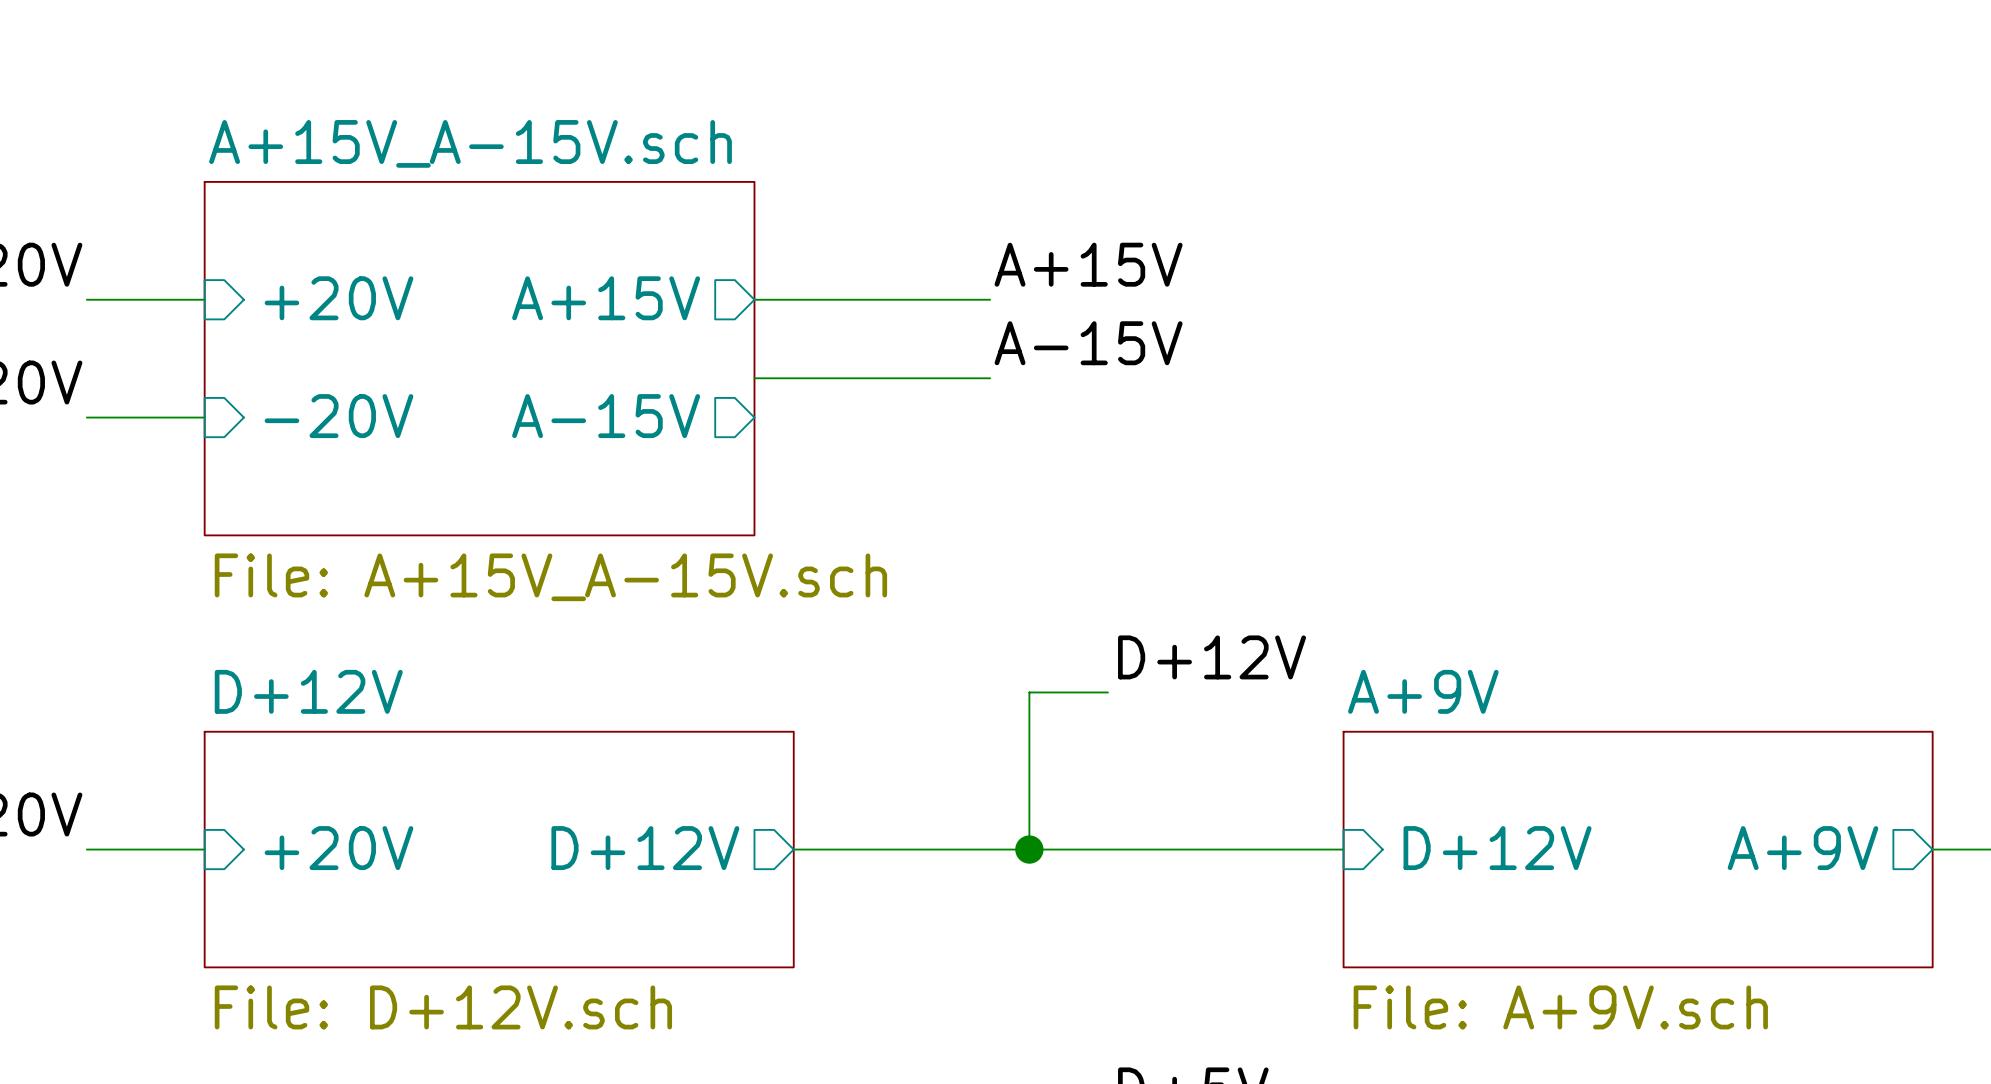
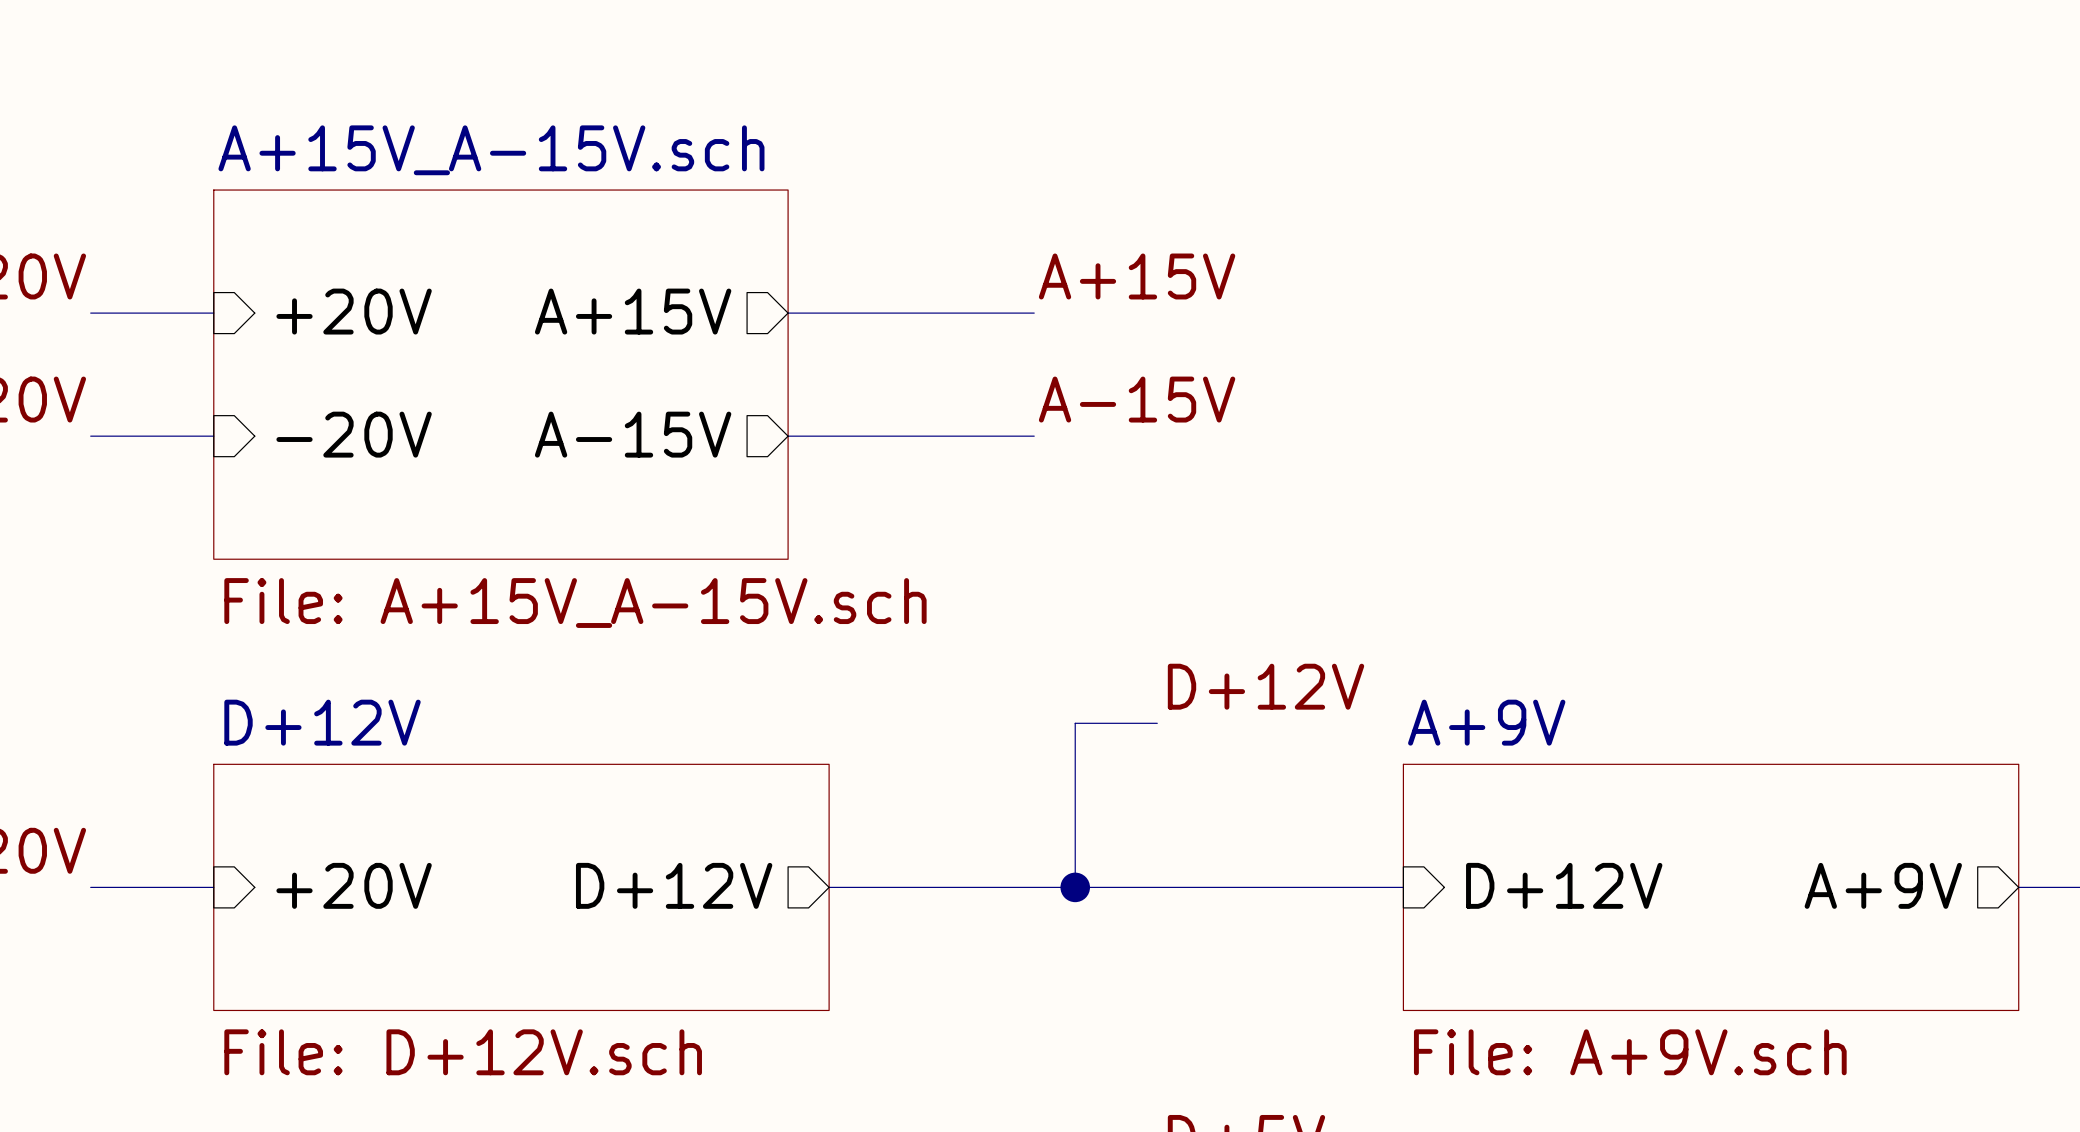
label position: A-15V (1088, 343) -> A-15V (1137, 399)
wire: (754, 378) (990, 378) -> (788, 436) (1034, 436)

